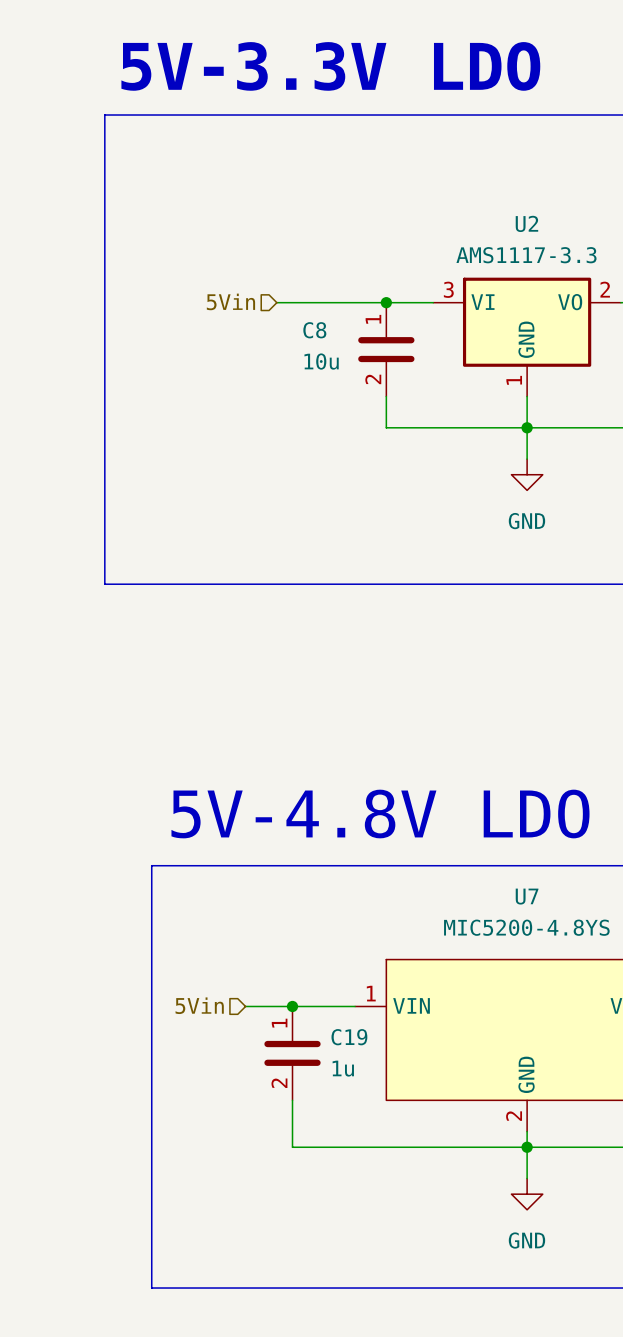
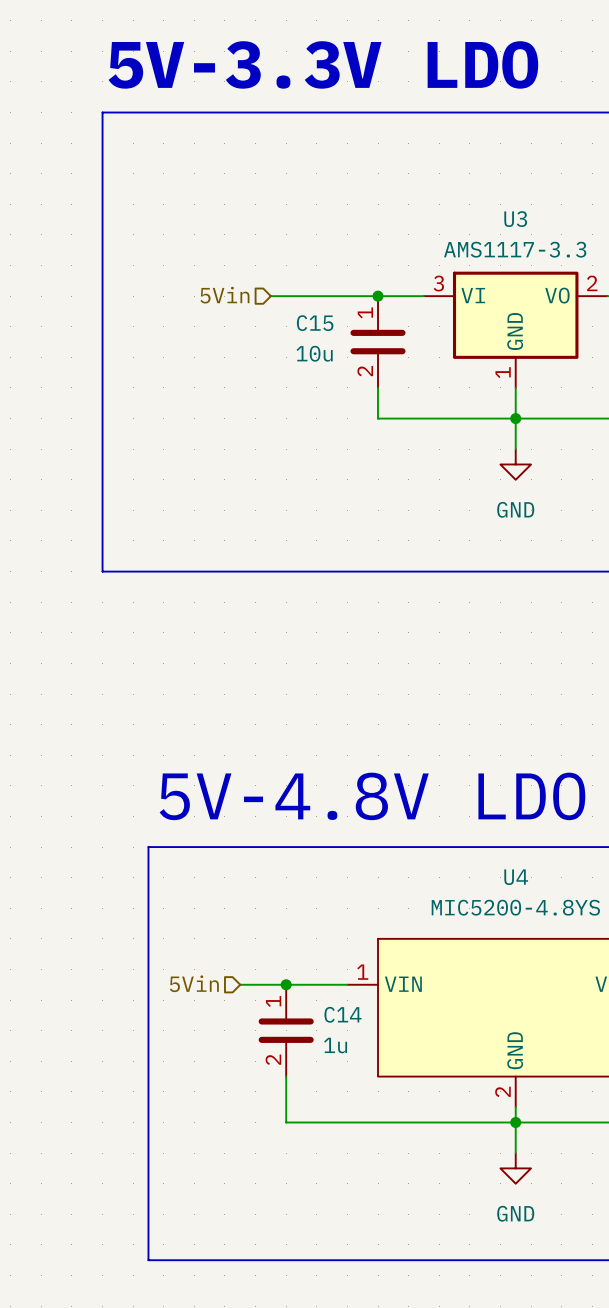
U2 name: U2 (526, 223) -> U3 (515, 219)
C8 name: C8 (314, 330) -> C15 (315, 323)
U7 name: U7 (527, 896) -> U4 (516, 877)
C19 name: C19 (349, 1037) -> C14 (343, 1014)

